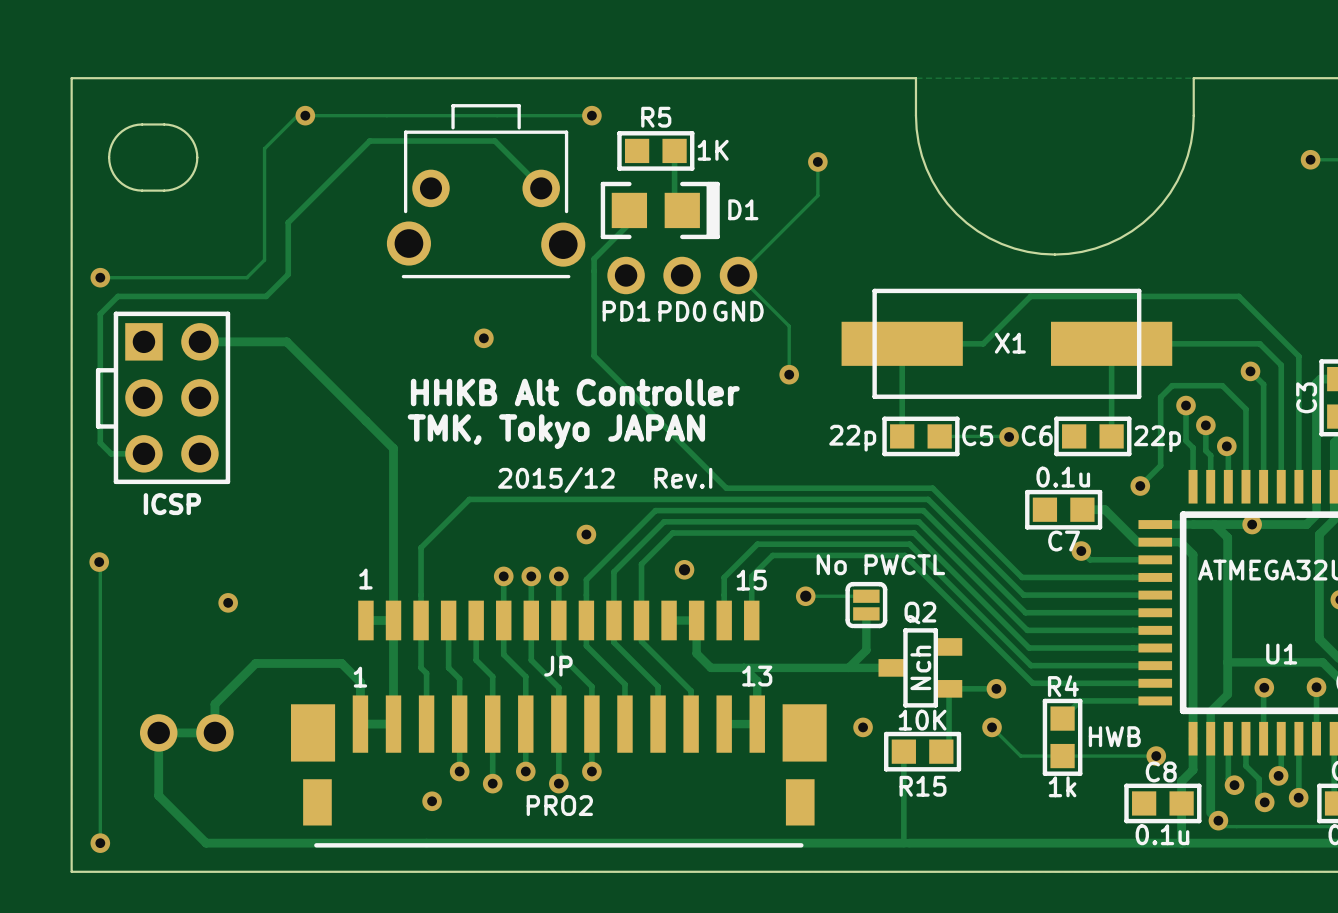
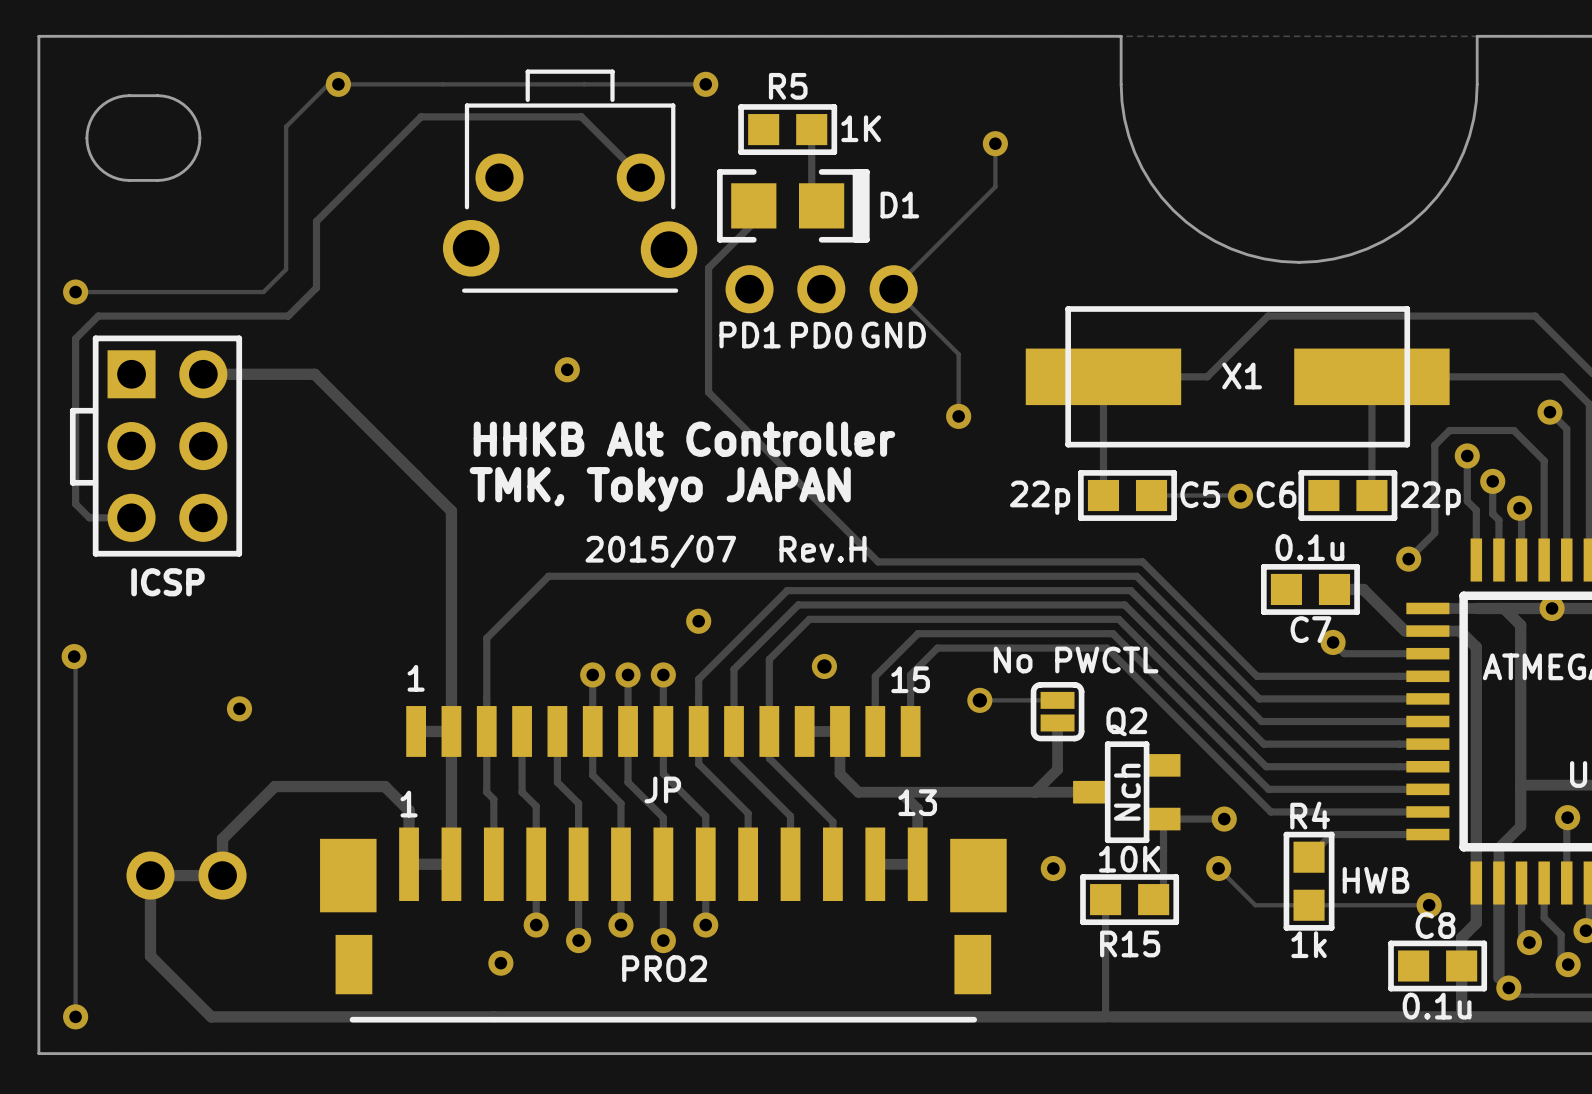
text: Rev.I (683, 478) -> Rev.H (823, 549)
text: 2015/12 (556, 479) -> 2015/07 (660, 551)

